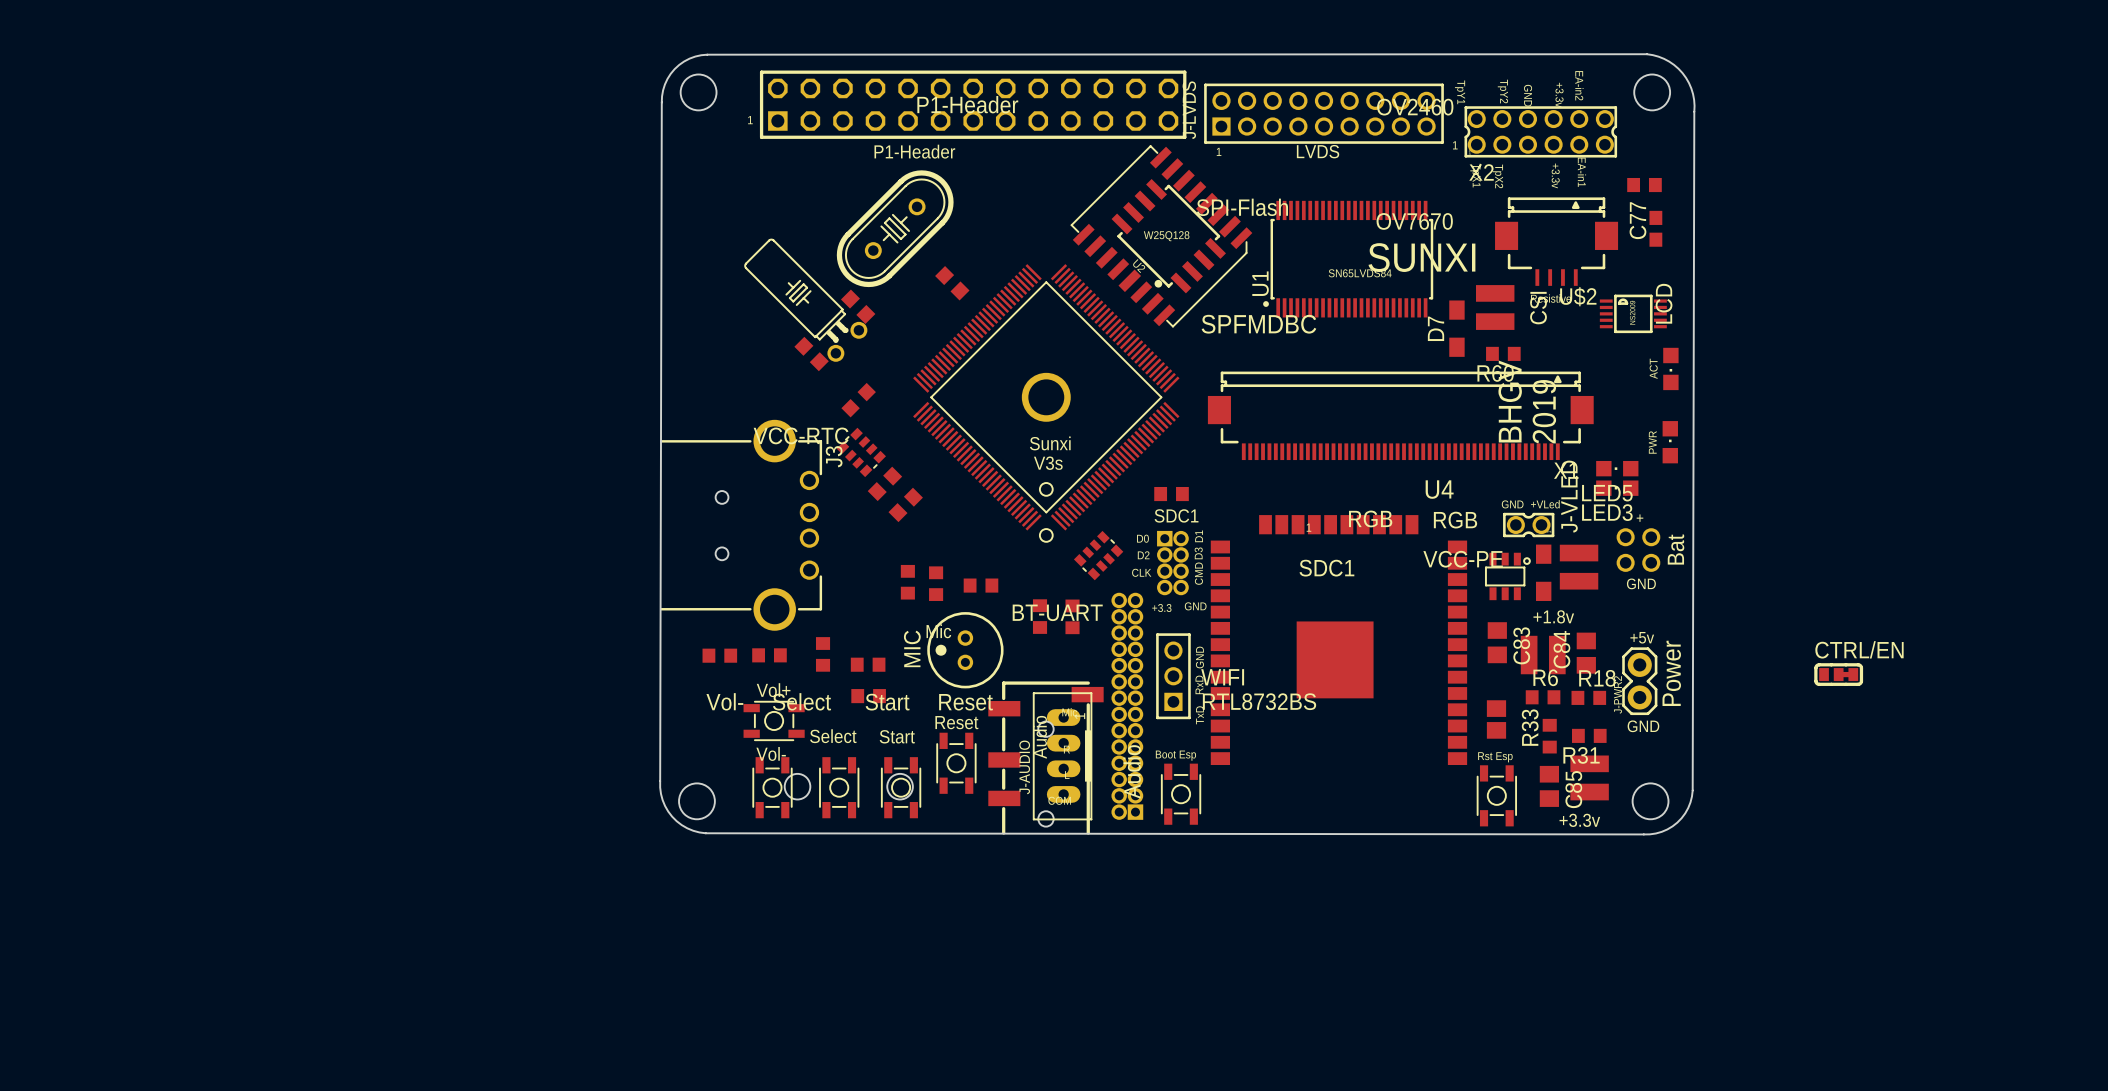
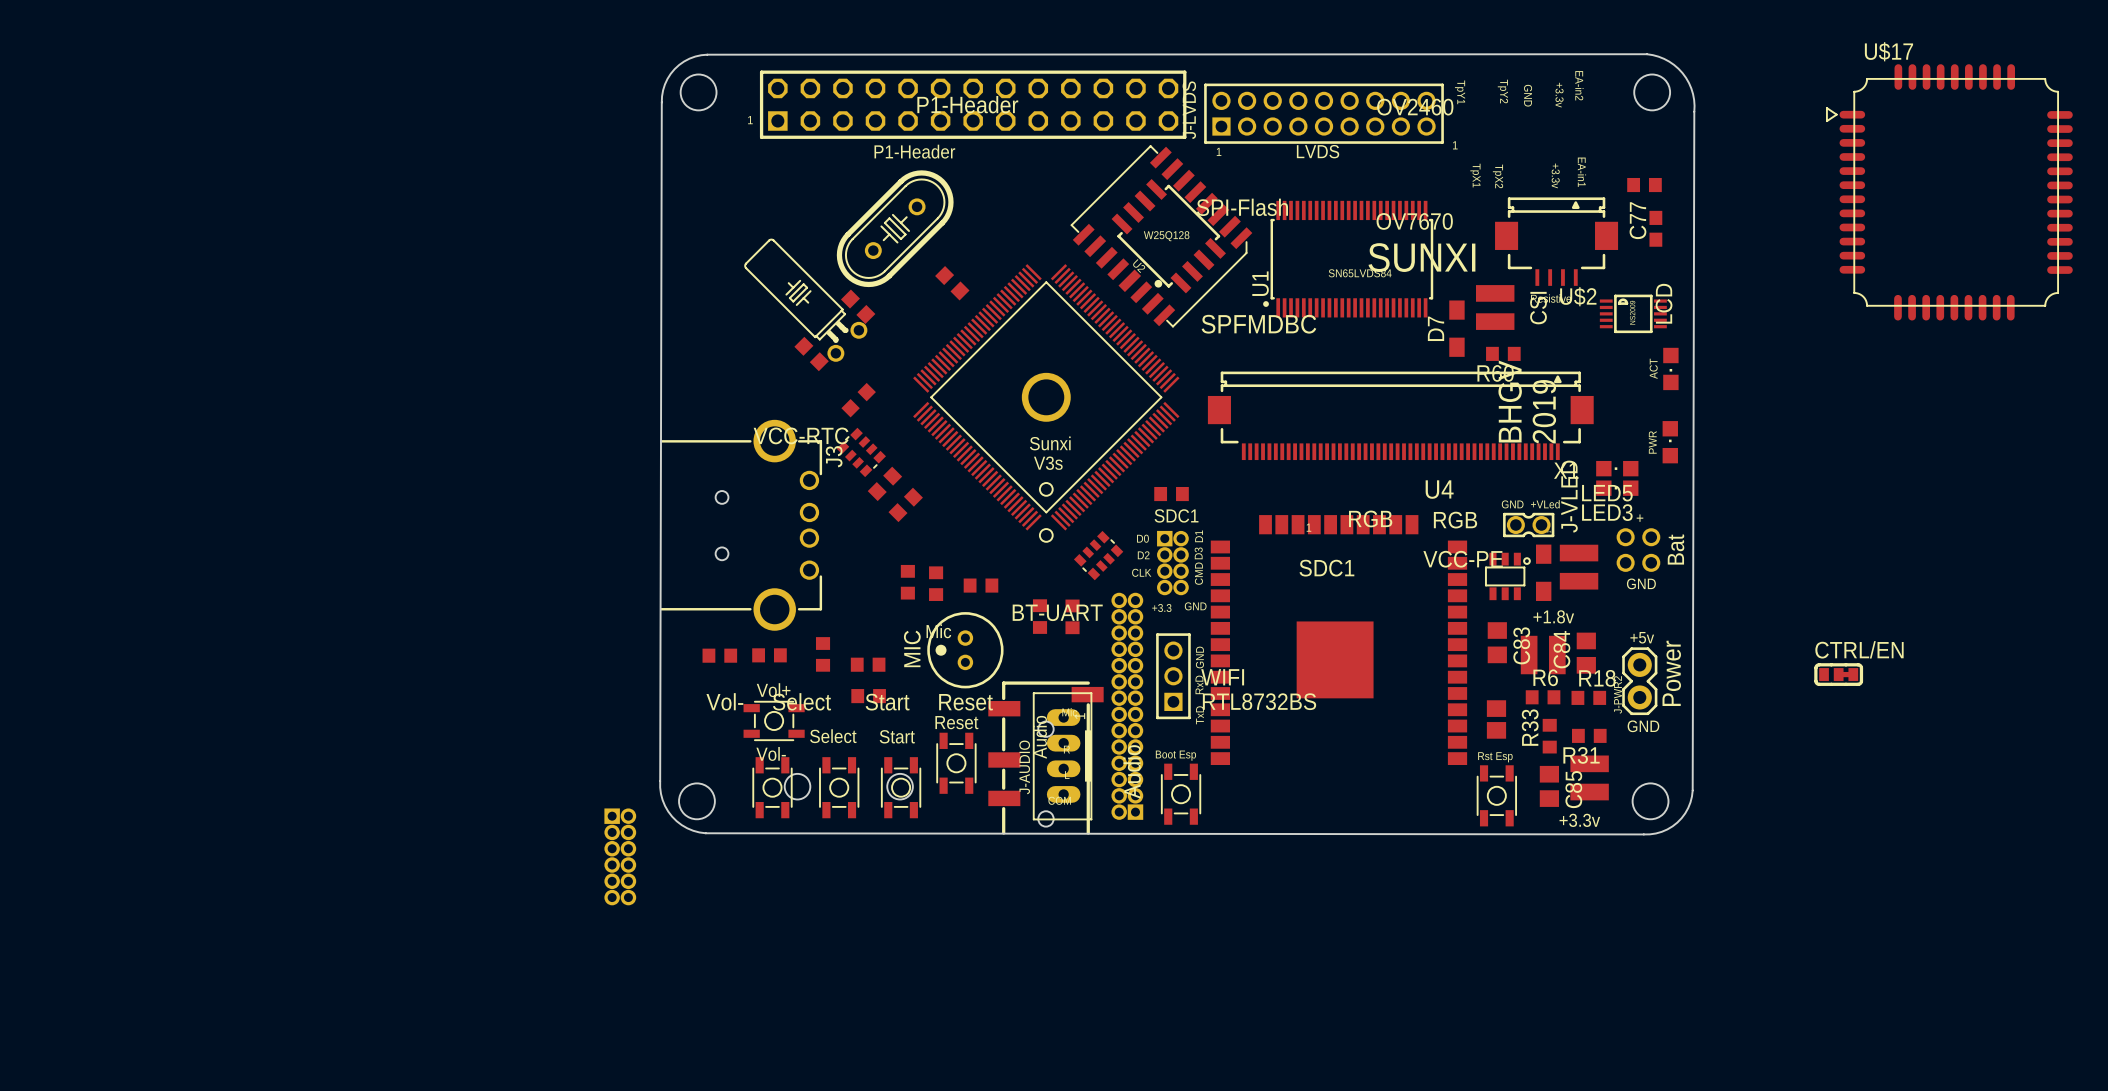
X2: (1540, 131) -> none
U$17: none -> (1949, 192)
part: none -> (620, 856)

